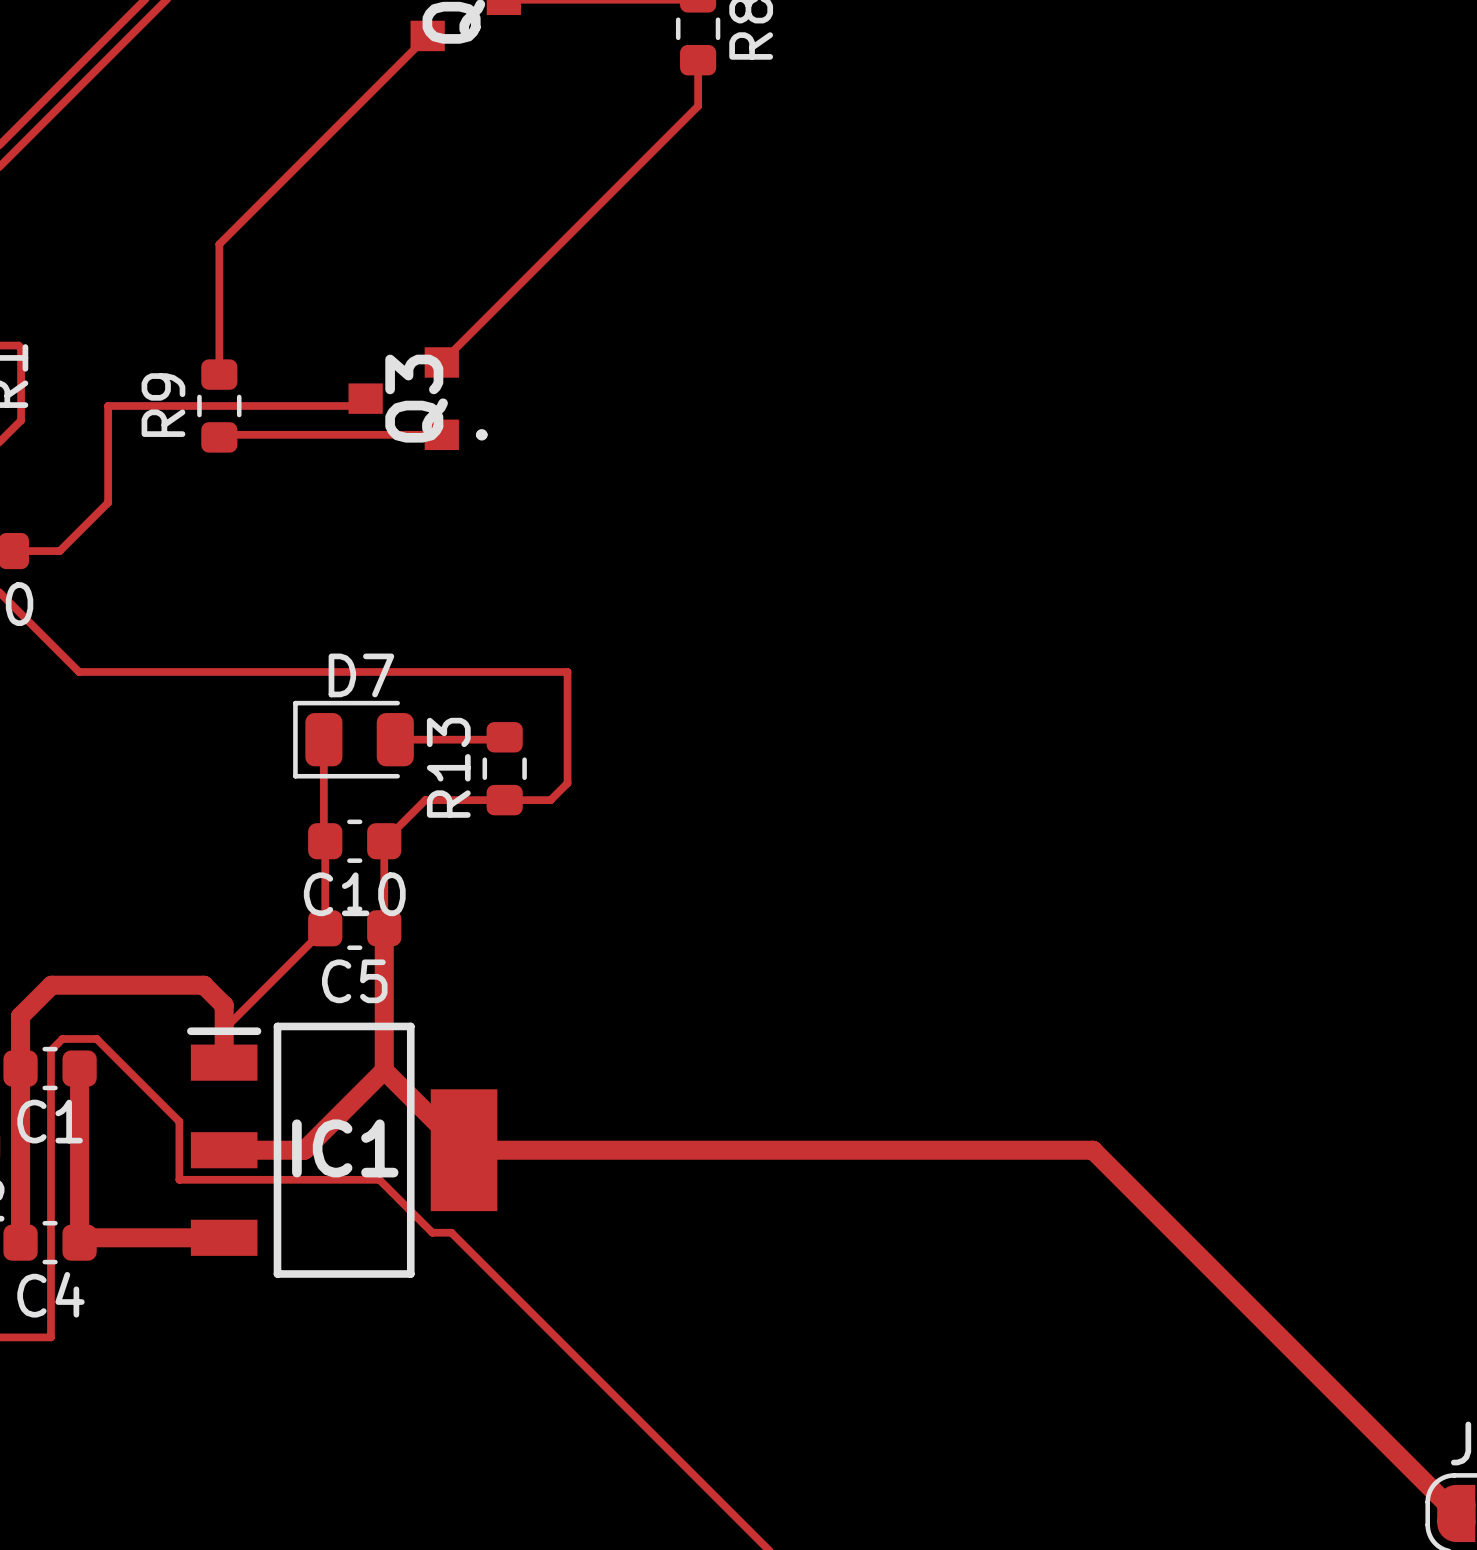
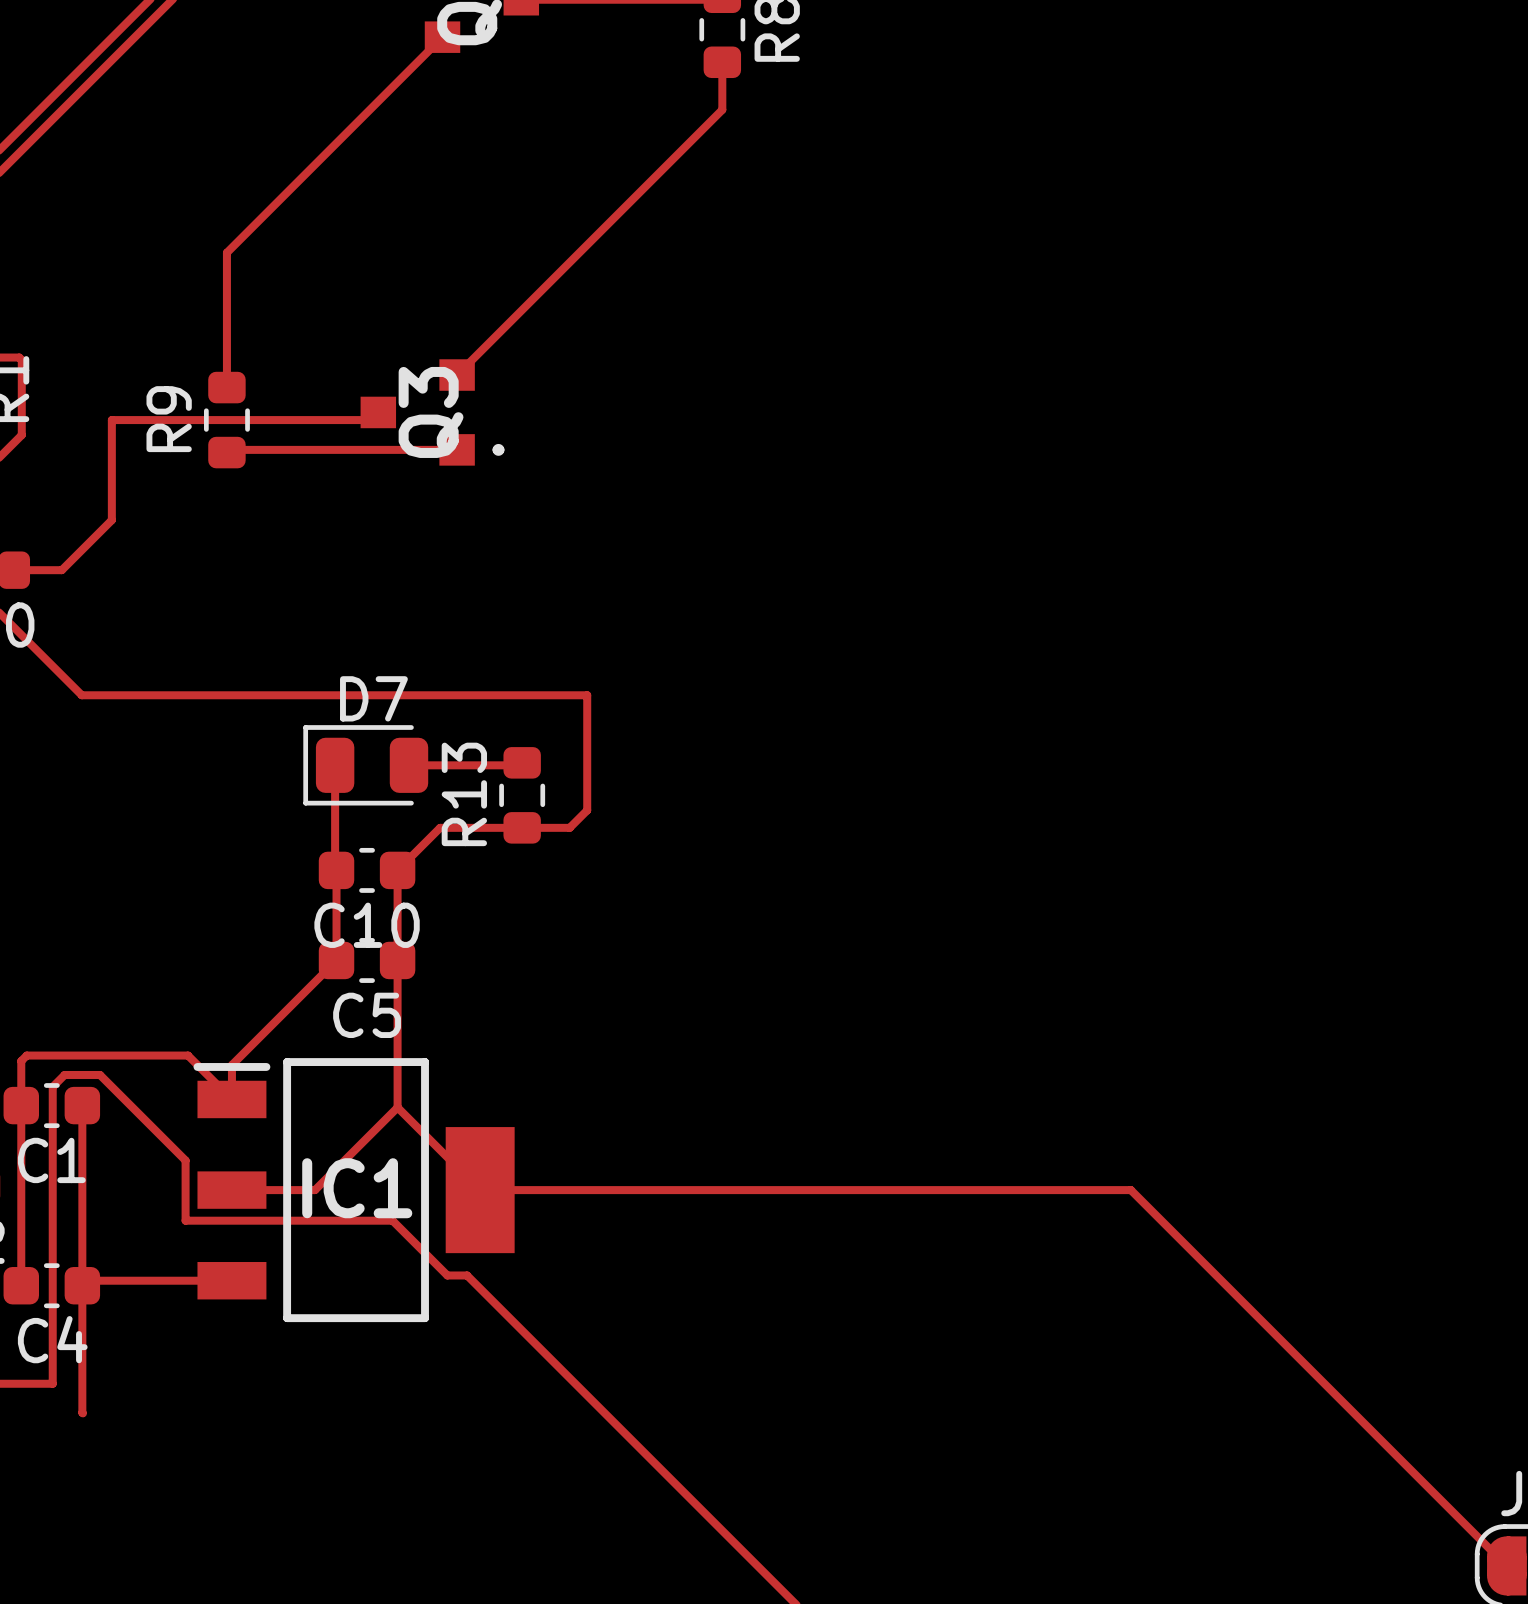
track width: thick (384, 928) (384, 1070) -> thin (397, 960) (397, 1107)
track: (20, 1025) (20, 1016) (51, 985) (203, 985) (224, 1005) (224, 1062) -> (21, 1061) (26, 1055) (188, 1055) (231, 1099)
track width: thick (20, 1025) (20, 1242) -> thin (21, 1061) (21, 1285)
track width: thick (79, 1068) (79, 1242) -> thin (82, 1105) (82, 1285)
track width: thick (384, 1070) (464, 1150) (1093, 1150) (1456, 1513) -> thin (397, 1107) (480, 1190) (1130, 1190) (1506, 1565)
track width: thick (384, 1070) (304, 1150) (224, 1150) -> thin (397, 1107) (315, 1190) (231, 1190)
track width: thick (84, 1237) (224, 1237) -> thin (87, 1280) (231, 1280)
track: none -> (82, 1285) (82, 1413)

